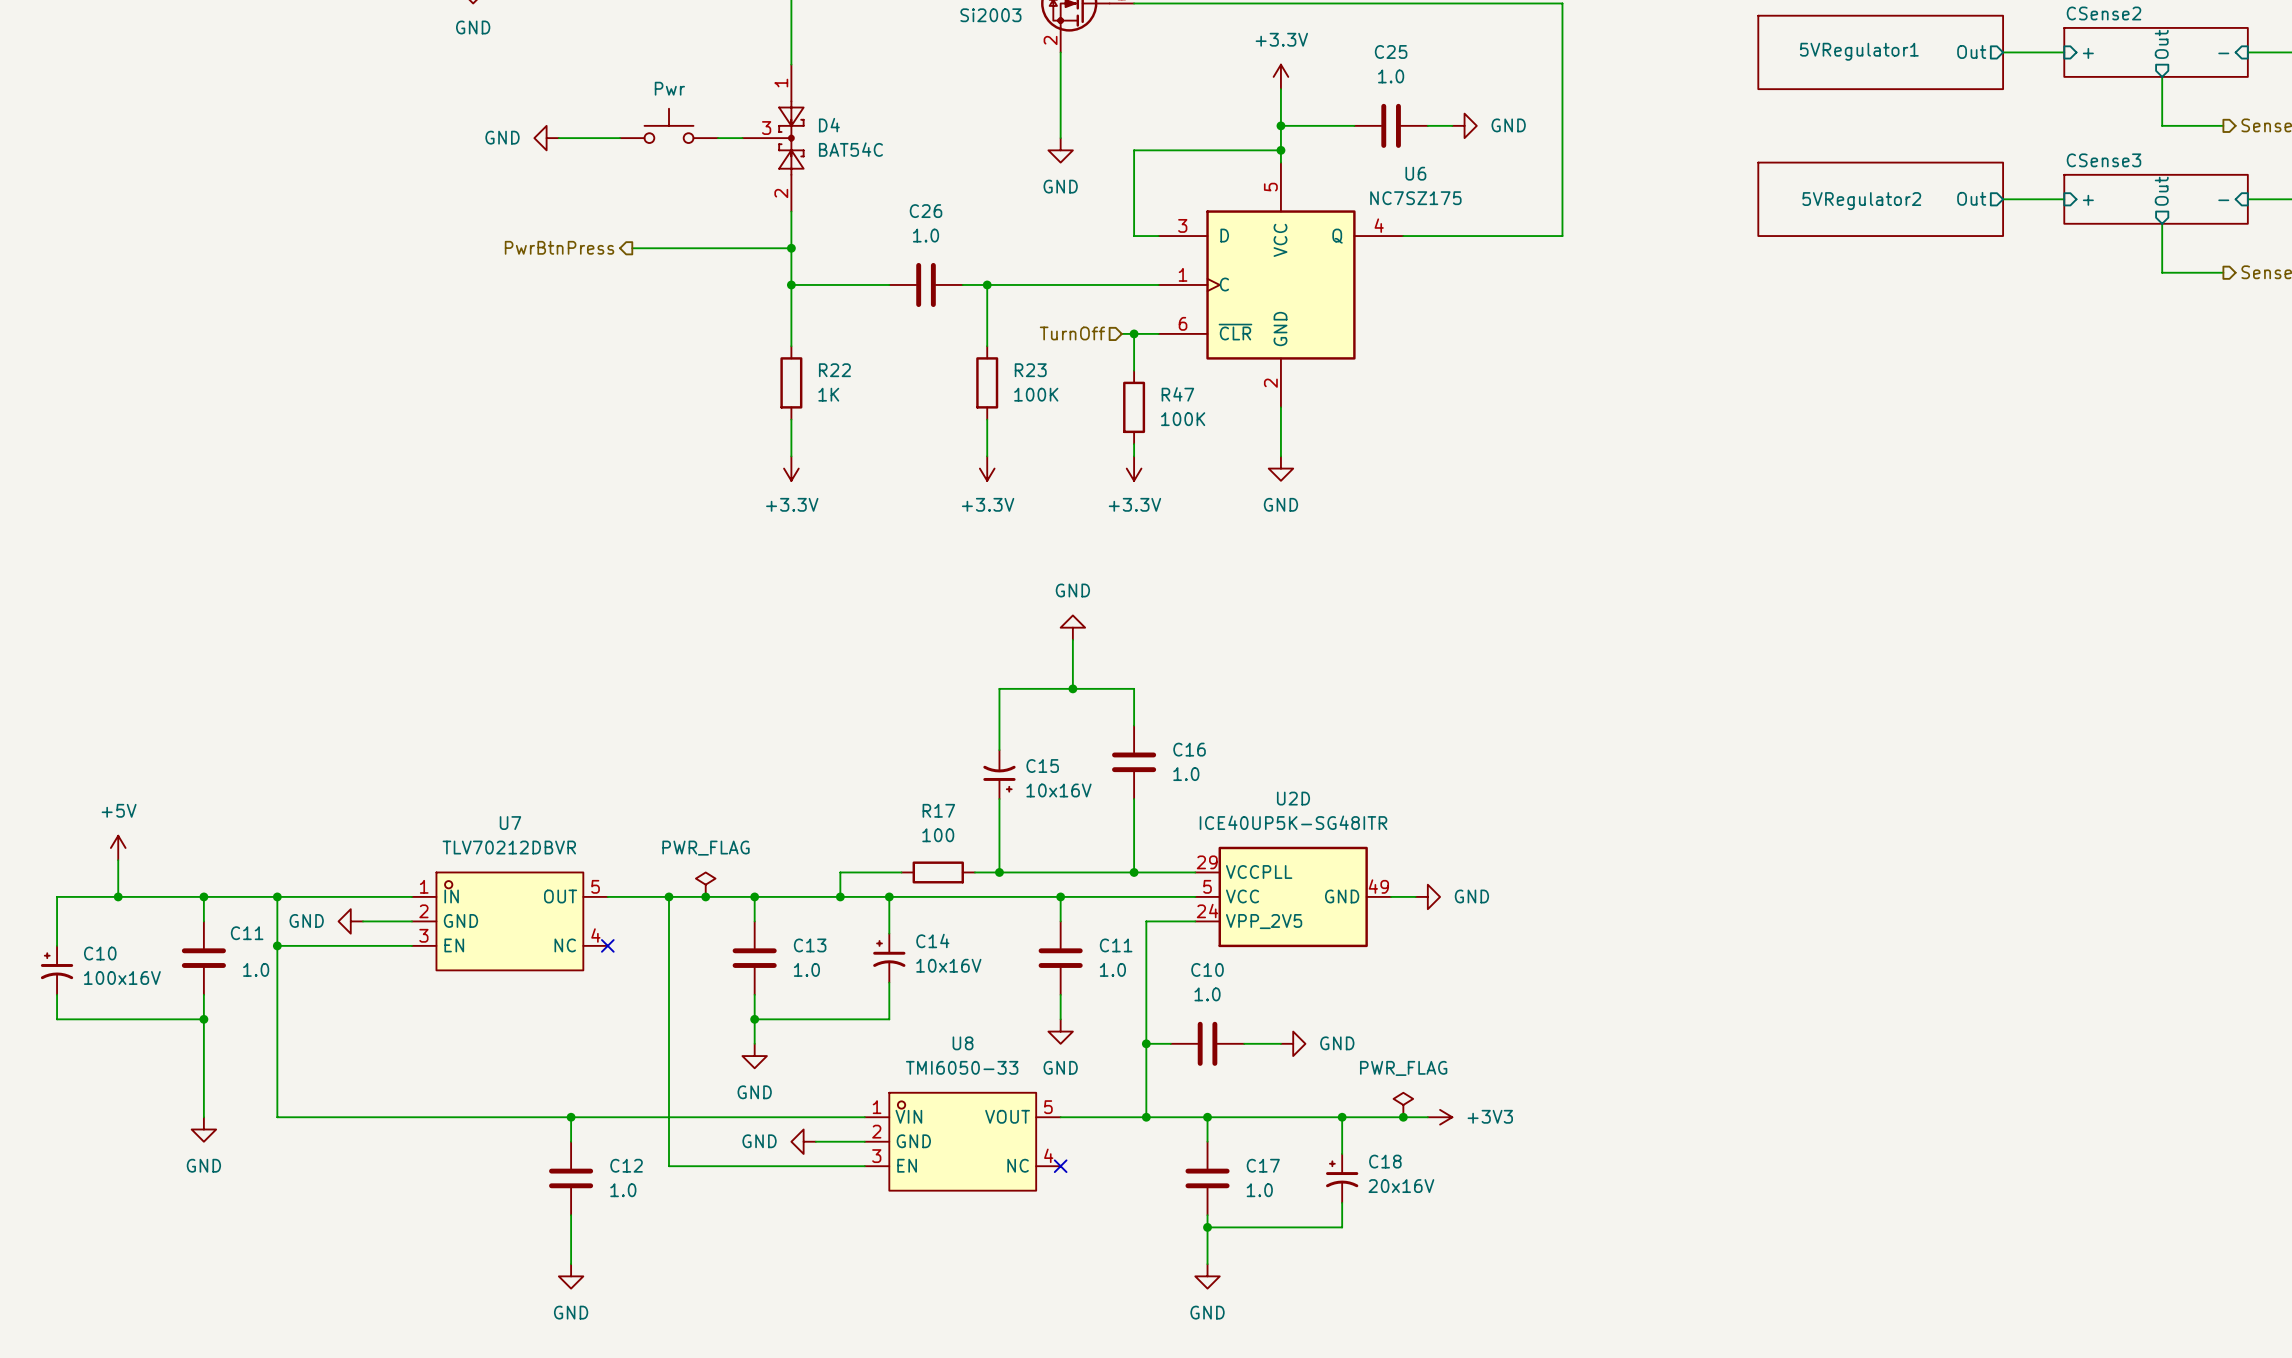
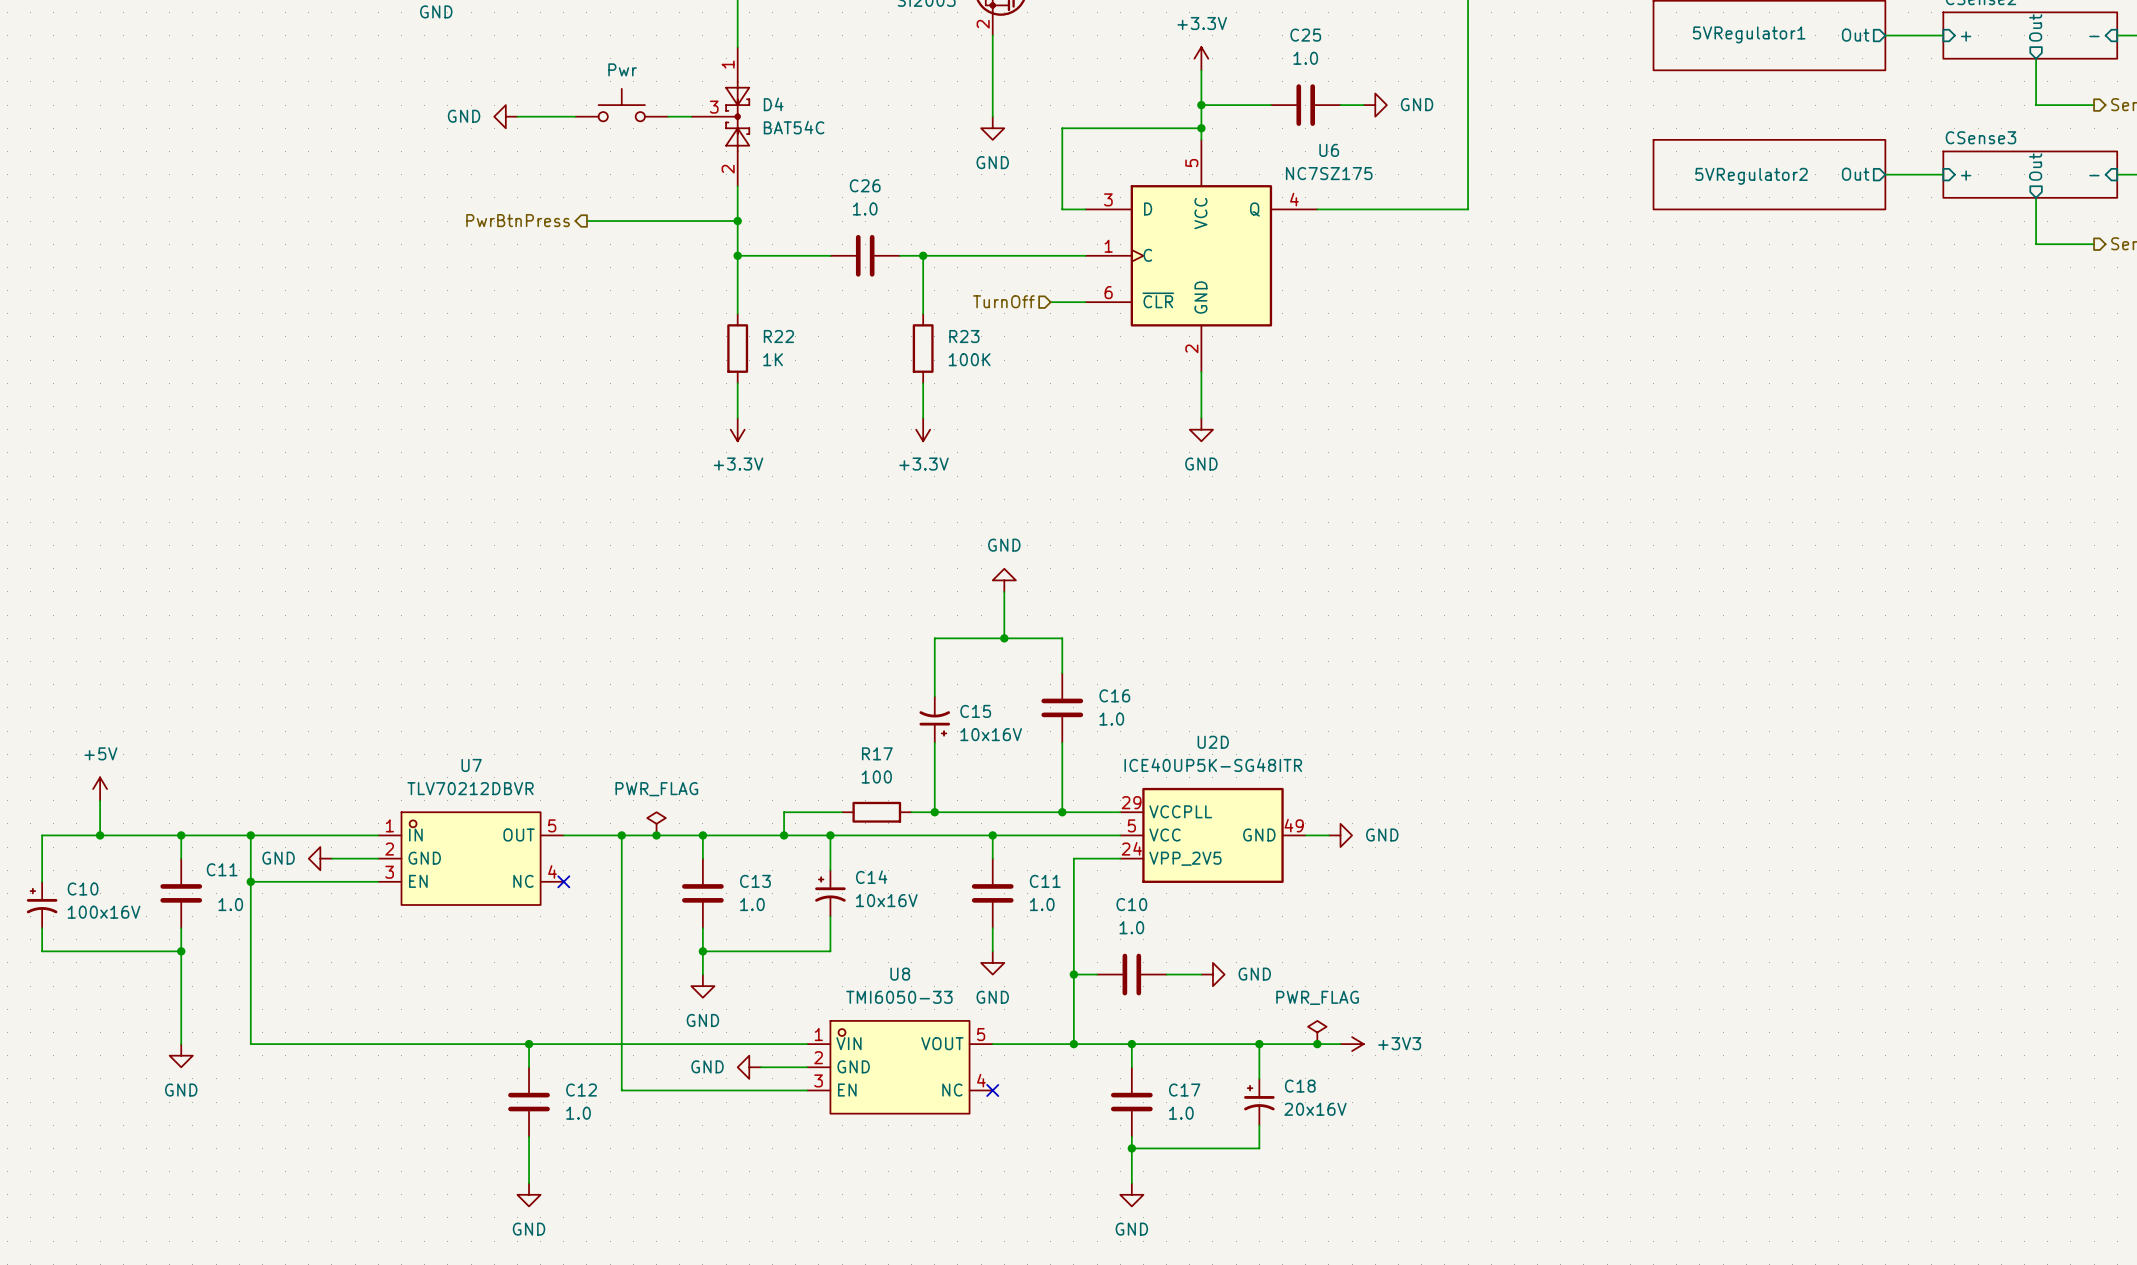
wire: (1134, 333) (1134, 370) -> none
junction: (1134, 333) -> none
R47: 100K (1134, 407) -> none
wire: (1134, 444) (1134, 456) -> none
power symbol: +3.3V (1134, 468) -> none

